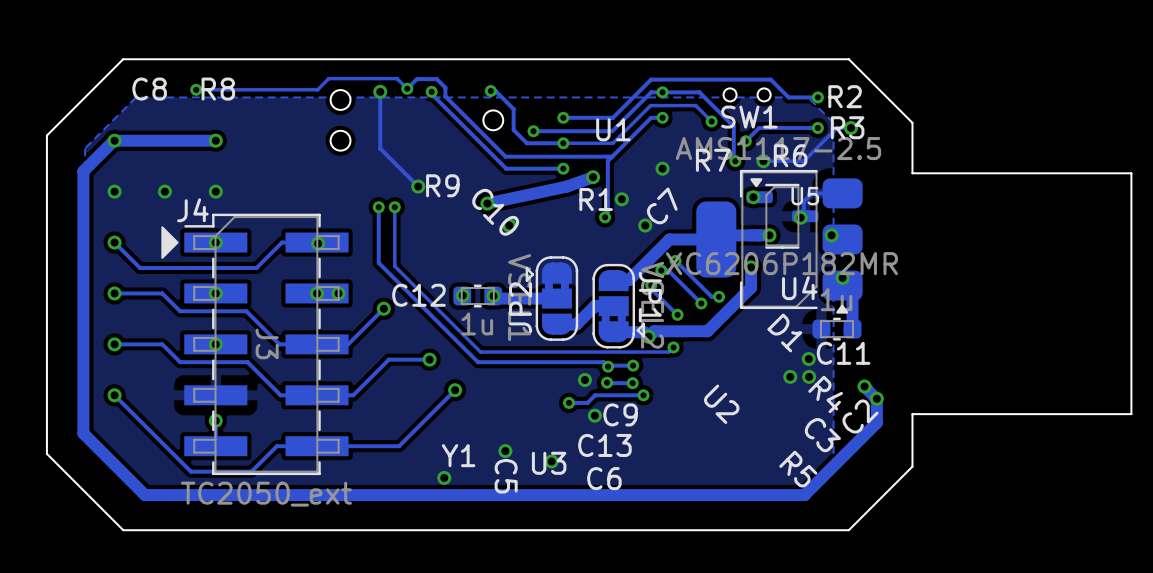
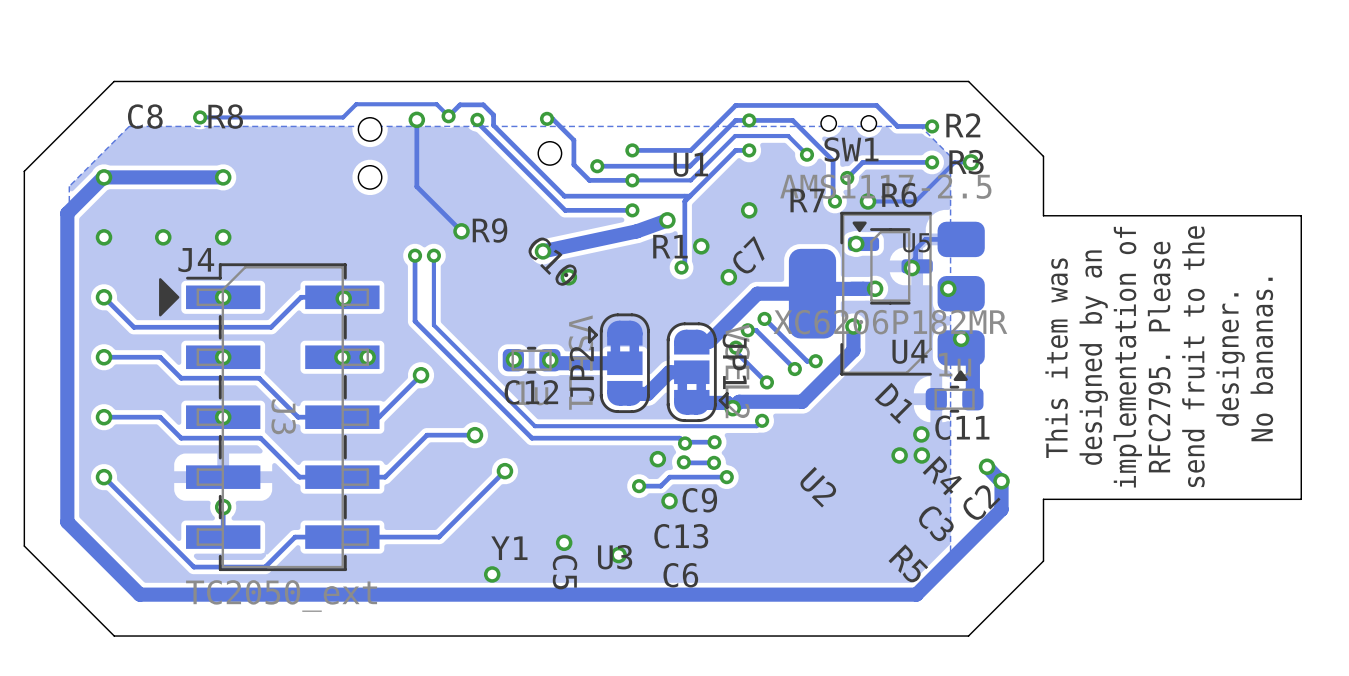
text: none -> implementation of (1127, 357)
text: none -> designed by an (1093, 357)
text: none -> RFC2795. Please (1159, 357)
text: none -> send fruit to the (1193, 356)
text: none -> designer. (1230, 359)
text: none -> No bananas. (1261, 359)
text: none -> This item was (1056, 358)
C12 name position: C12 (418, 295) -> C12 (531, 392)

